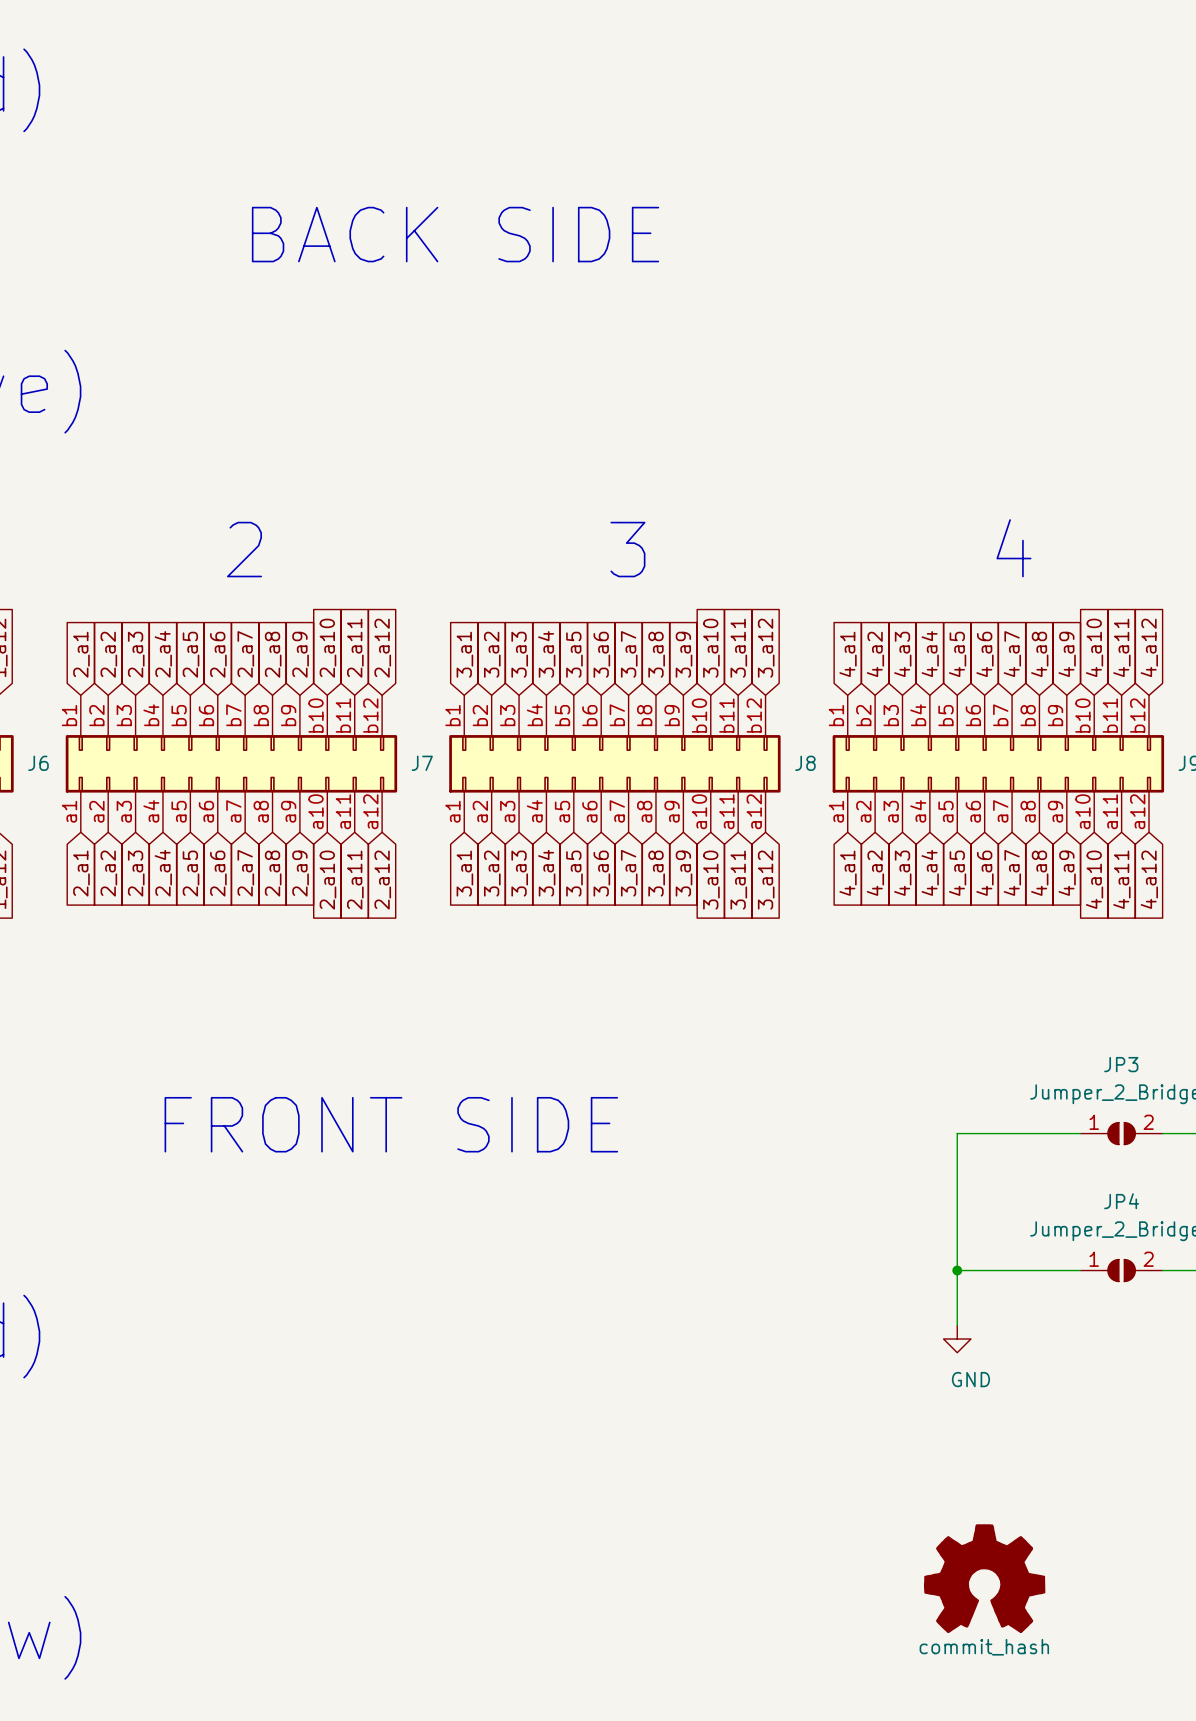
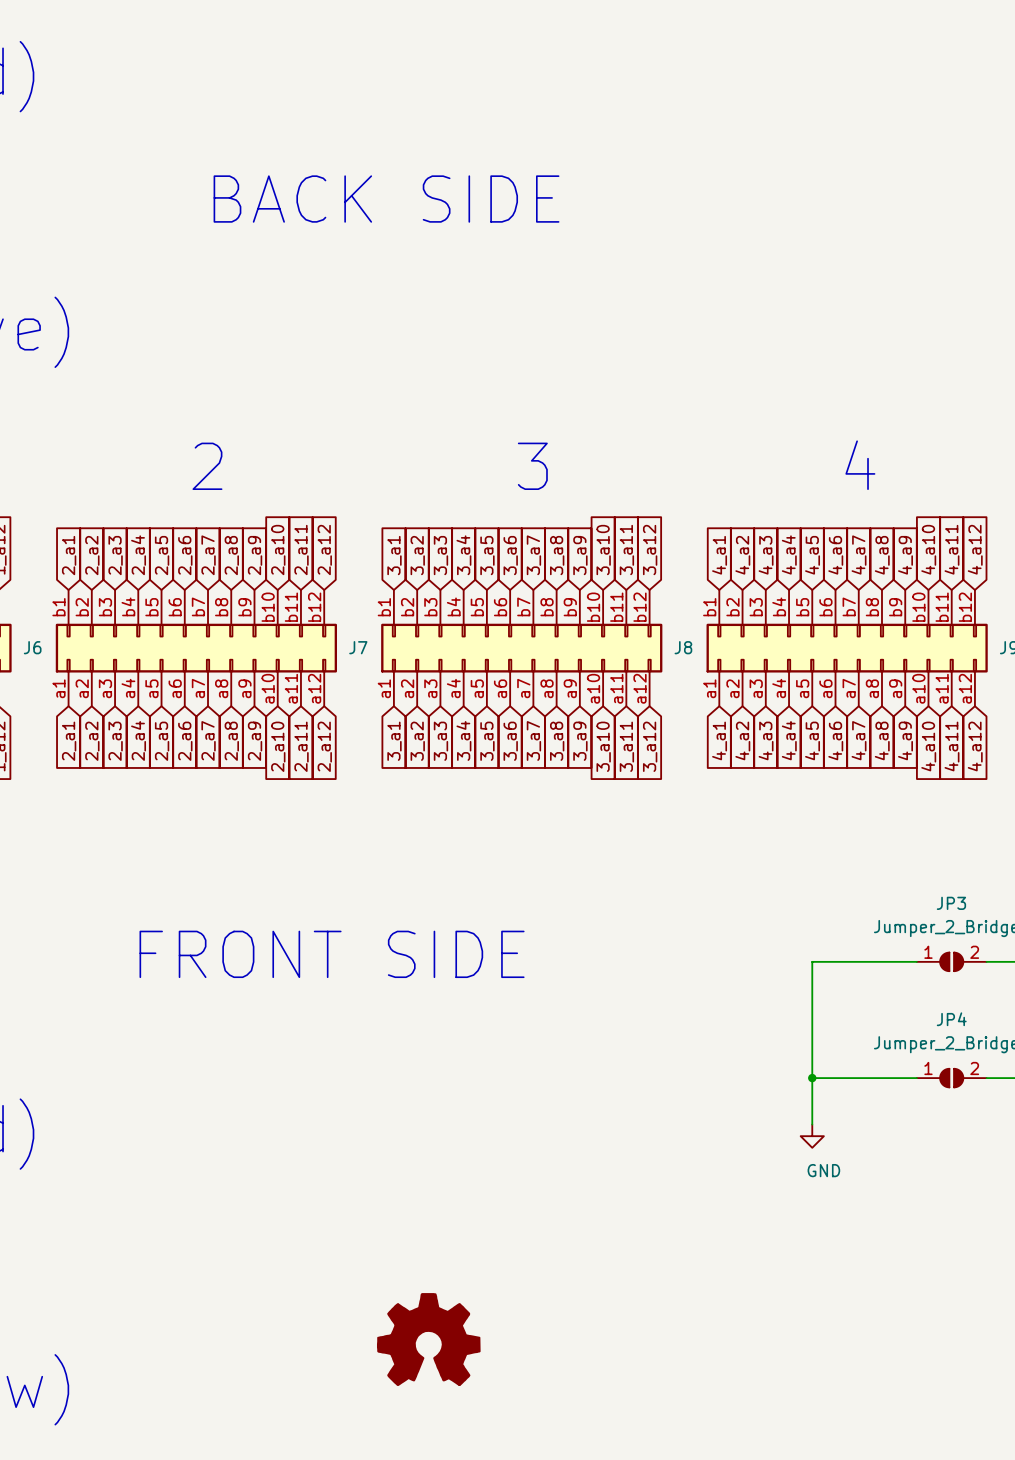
part: none -> (428, 1339)
power symbol: commit_hash (984, 1578) -> none

